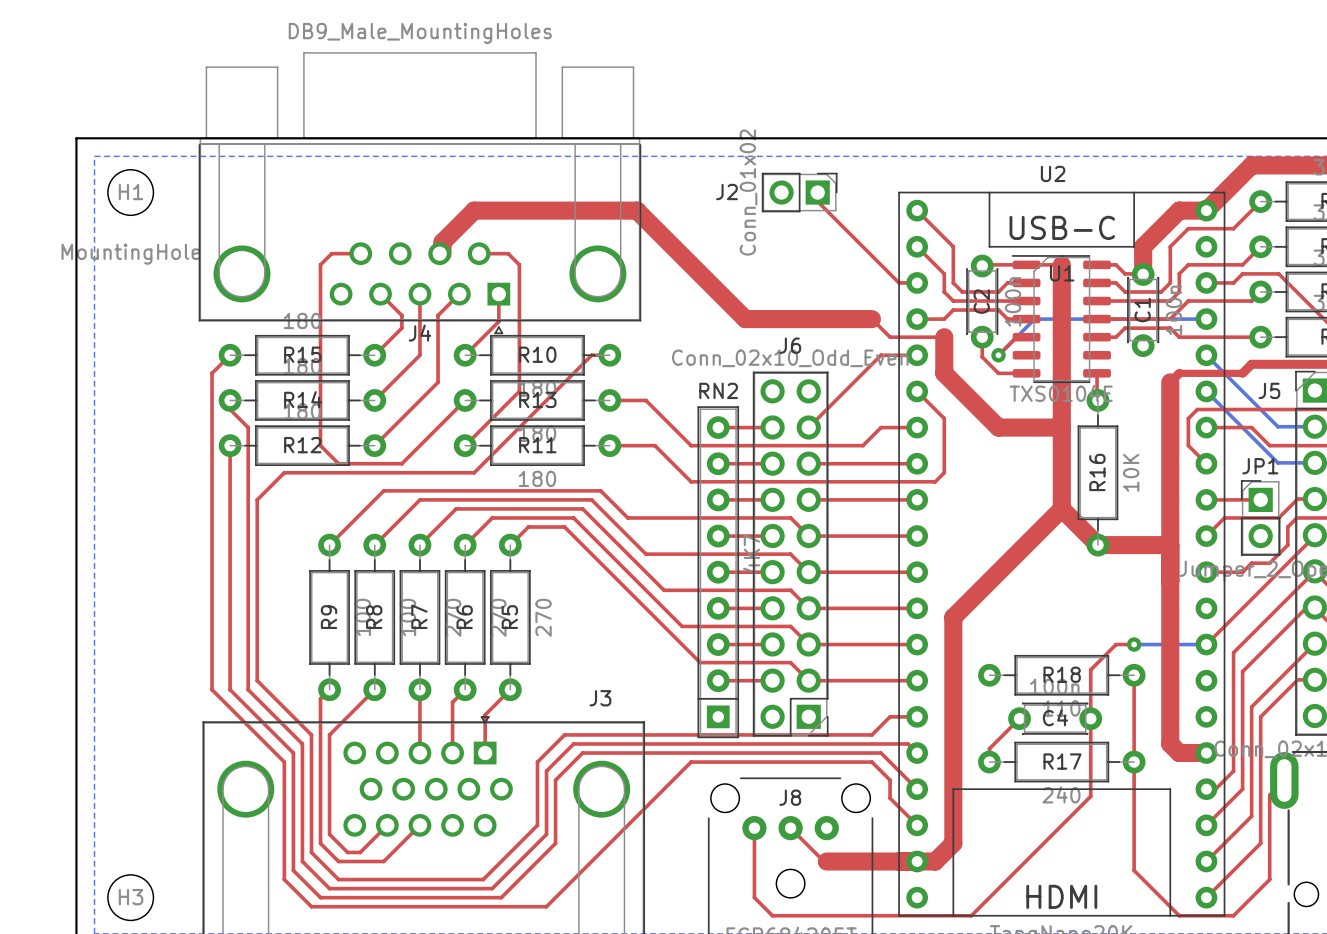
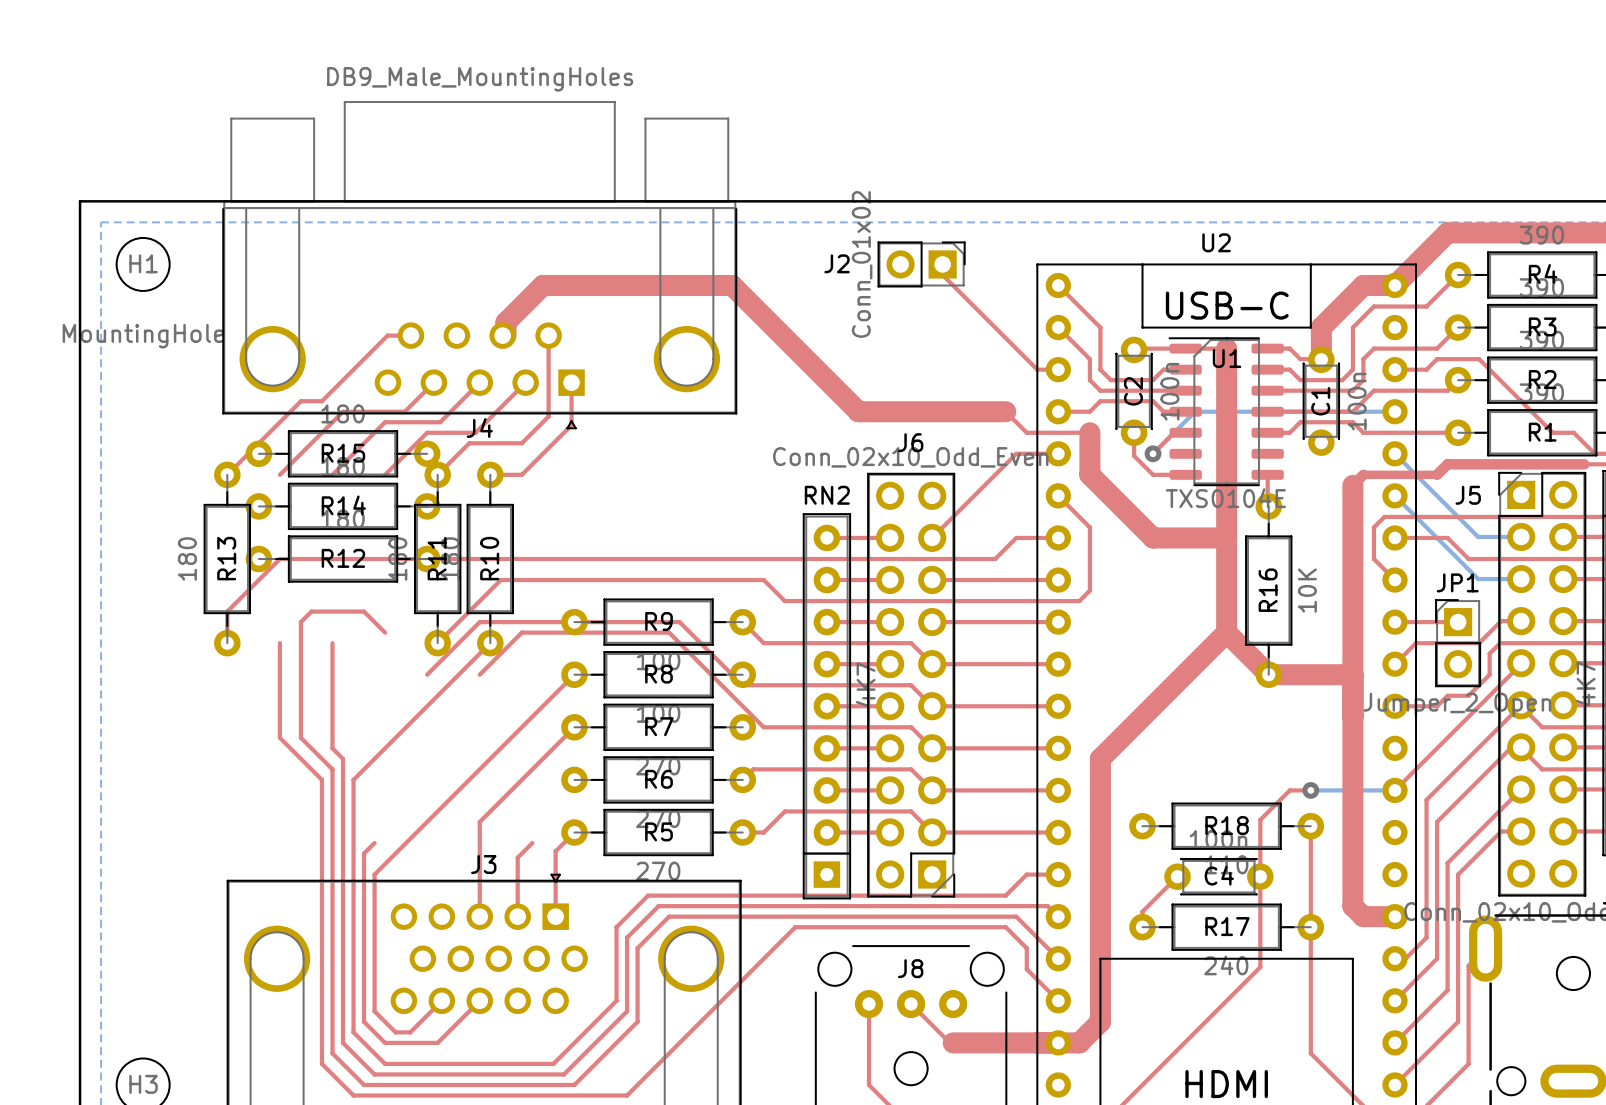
top track: (340, 253) (331, 253) (320, 264) (320, 445) (338, 463) (401, 463) (465, 400) -> (387, 335) (321, 401) (300, 401) (227, 474)
top track: (479, 253) (508, 253) (519, 264) (519, 391) (465, 445) -> (548, 335) (548, 416) (521, 443) (469, 443) (437, 474)
top track: (380, 294) (401, 315) (401, 328) (374, 355) -> (433, 382) (404, 411) (343, 411) (279, 474)
top track: (419, 294) (419, 355) (374, 400) -> (479, 382) (440, 422) (385, 422) (332, 474)
top track: (438, 315) (438, 382) (374, 445) -> (500, 407) (475, 432) (427, 432) (385, 474)
top track: (498, 321) (465, 355) -> (571, 414) (571, 425) (521, 474) (490, 474)
top track: (230, 355) (212, 373) (212, 689) (284, 762) -> none
R10 rotation: 0° (537, 355) -> 90° clockwise (490, 559)
R10 position: (537, 355) -> (490, 559)
top track: (609, 355) (591, 355) (474, 472) (284, 472) (257, 499) (257, 680) (311, 734) -> (490, 643) (353, 779) (353, 895)
R13 rotation: 0° (537, 400) -> 90° clockwise (227, 559)
R13 position: (537, 400) -> (227, 559)
top track: (609, 400) (645, 400) (691, 445) -> none
top track: (230, 409) (248, 427) (248, 517) -> none
top track: (230, 445) (230, 689) (293, 753) -> (385, 632) (364, 611) (311, 611) (300, 622) (300, 737) (332, 769) (332, 916)
R11 rotation: 0° (537, 445) -> 90° clockwise (437, 559)
R11 position: (537, 445) -> (437, 559)
top track: none -> (700, 559) (279, 559) (227, 611) (227, 643)
top track: (655, 445) (691, 481) -> (753, 559) (795, 559)
top track: none -> (795, 601) (784, 601) (763, 580) (500, 580) (437, 643)
top track: none -> (332, 643) (332, 748) (343, 758) (343, 906)
top track: (664, 517) (627, 517) (600, 490) (383, 490) (329, 545) -> (763, 643) (742, 622)
top track: (465, 545) (492, 517) (573, 517) (682, 626) -> (742, 779) (753, 769) (784, 769)
top track: (510, 545) (528, 527) (564, 527) (700, 662) -> (742, 832) (763, 832) (784, 811) (805, 811)
top track: none -> (574, 727) (479, 821) (479, 843)
top track: (248, 599) (248, 689) (302, 743) -> (279, 737) (321, 779) (321, 927)
R9 rotation: 0° (329, 617) -> 90° clockwise (658, 622)
R9 position: (329, 617) -> (658, 622)
R8 rotation: 0° (374, 617) -> 90° clockwise (658, 674)
R8 position: (374, 617) -> (658, 674)
R7 rotation: 0° (419, 617) -> 90° clockwise (658, 727)
R7 position: (419, 617) -> (658, 727)
R6 rotation: 0° (465, 617) -> 90° clockwise (658, 779)
R6 position: (465, 617) -> (658, 779)
R5 rotation: 0° (510, 617) -> 90° clockwise (658, 832)
top track: (374, 689) (329, 734) -> (574, 674) (374, 874) (374, 895)
top track: (510, 689) (485, 714) -> (574, 832) (555, 851) (555, 872)
J3 name position: J3 (600, 698) -> J3 (483, 864)

